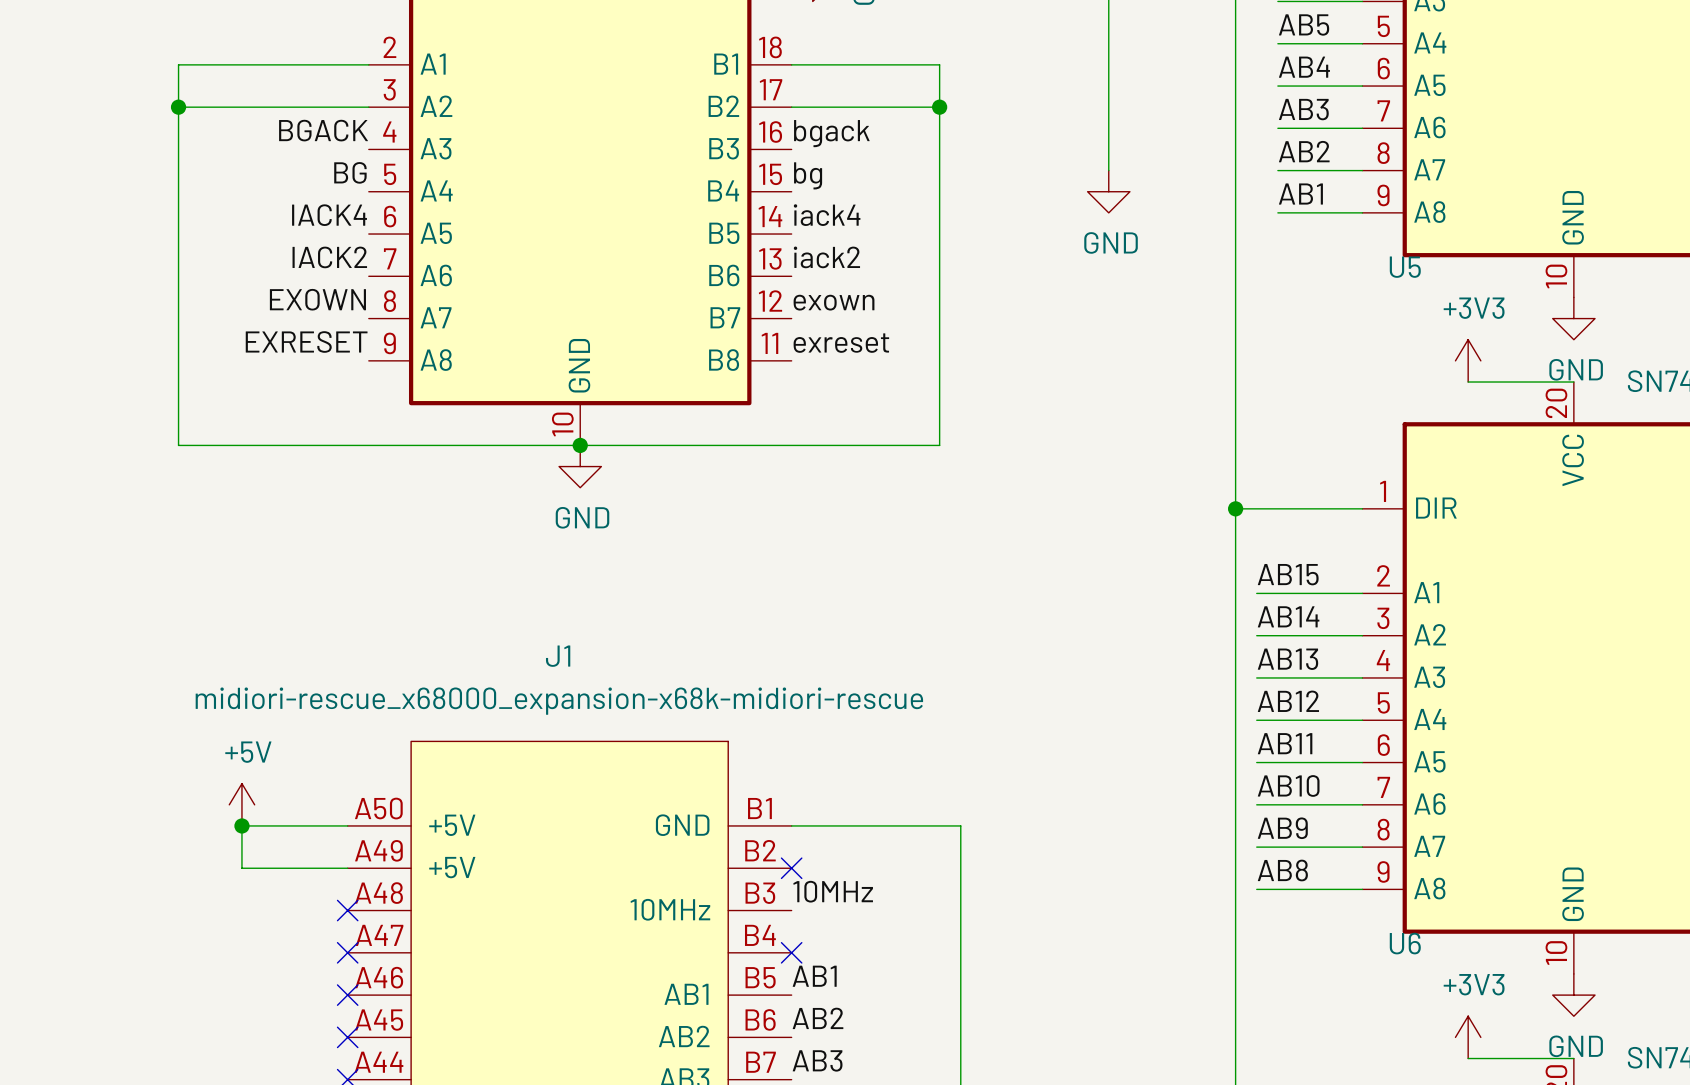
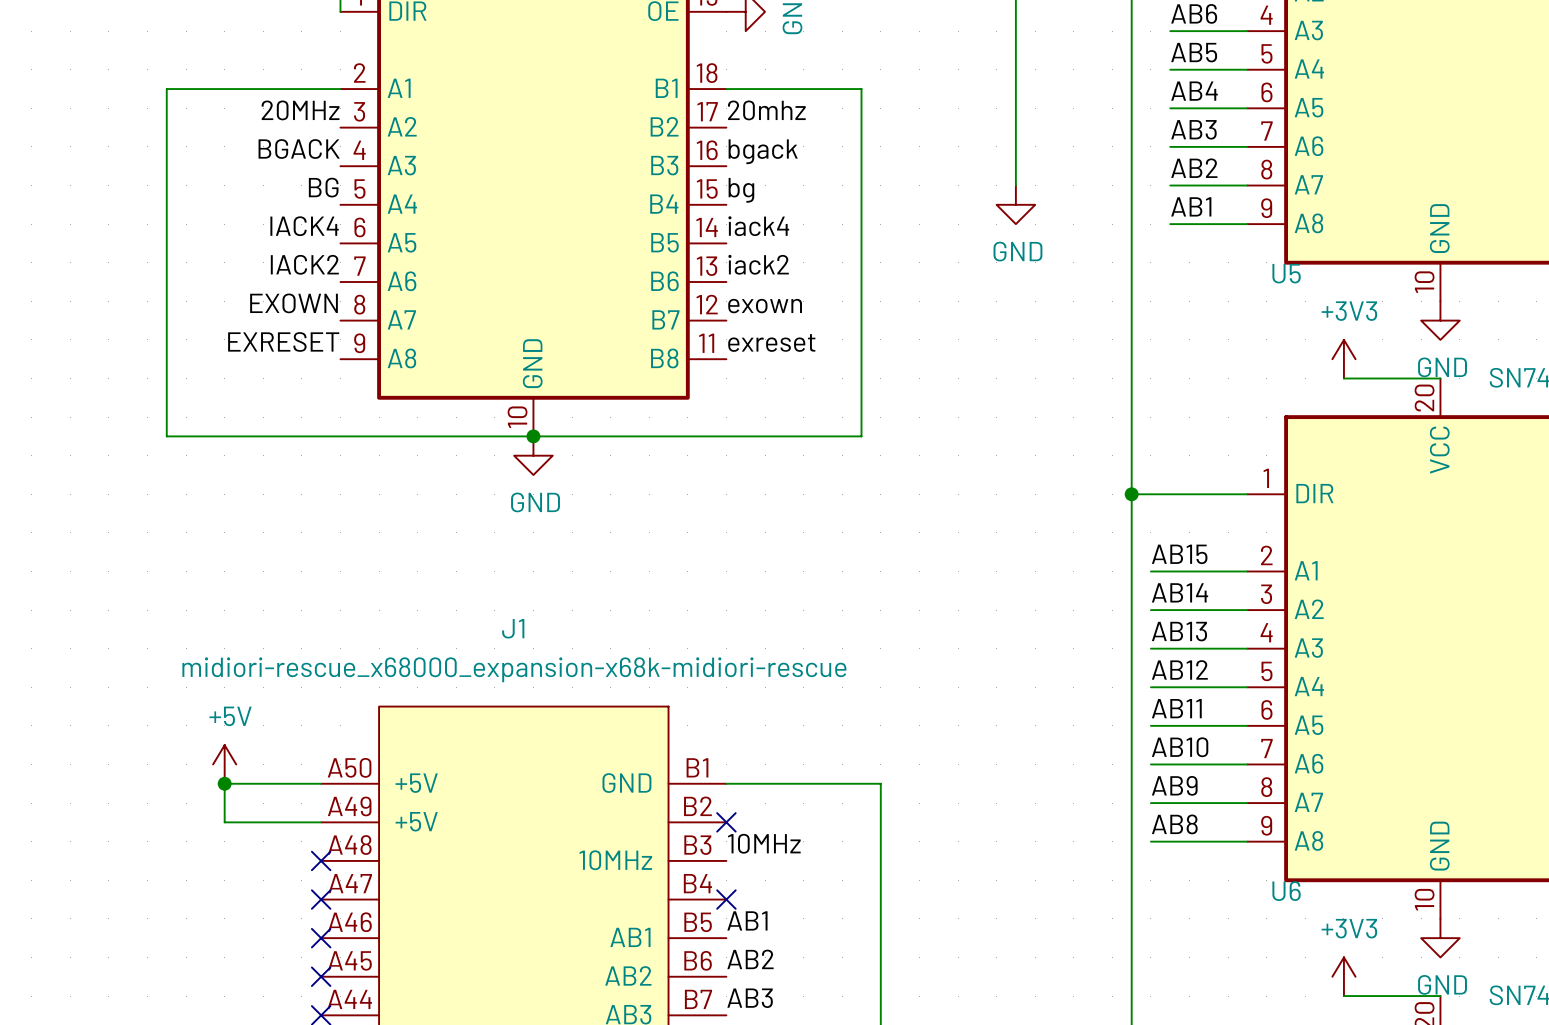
label: none -> 20MHz (300, 110)
label: none -> 20mhz (766, 110)
wire: (178, 107) (368, 107) -> none
junction: (178, 107) -> none
wire: (791, 107) (939, 107) -> none
junction: (939, 107) -> none

